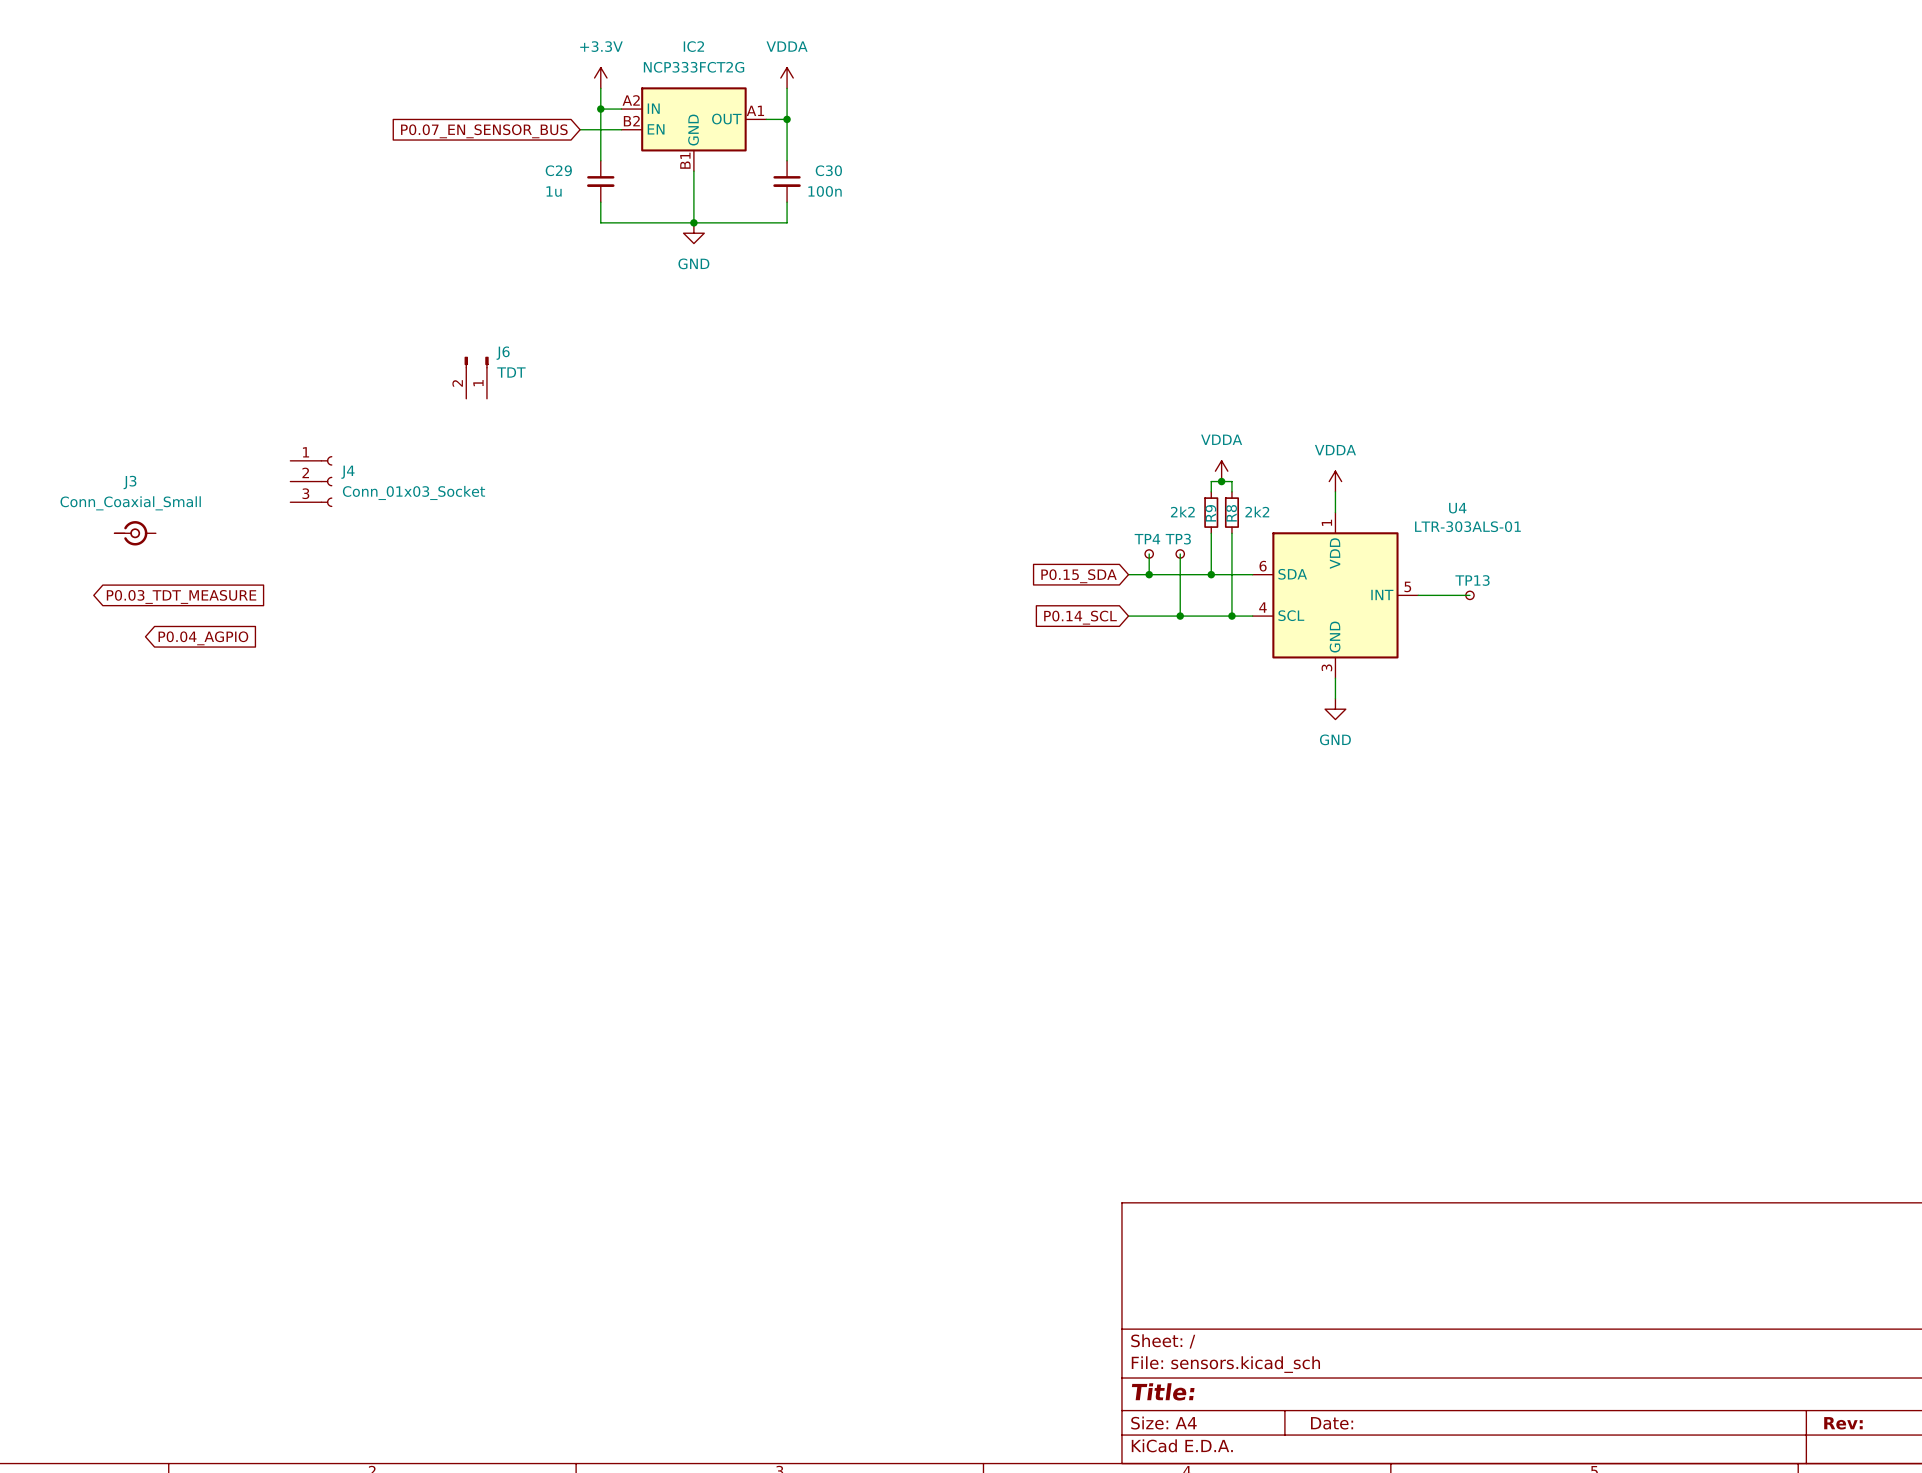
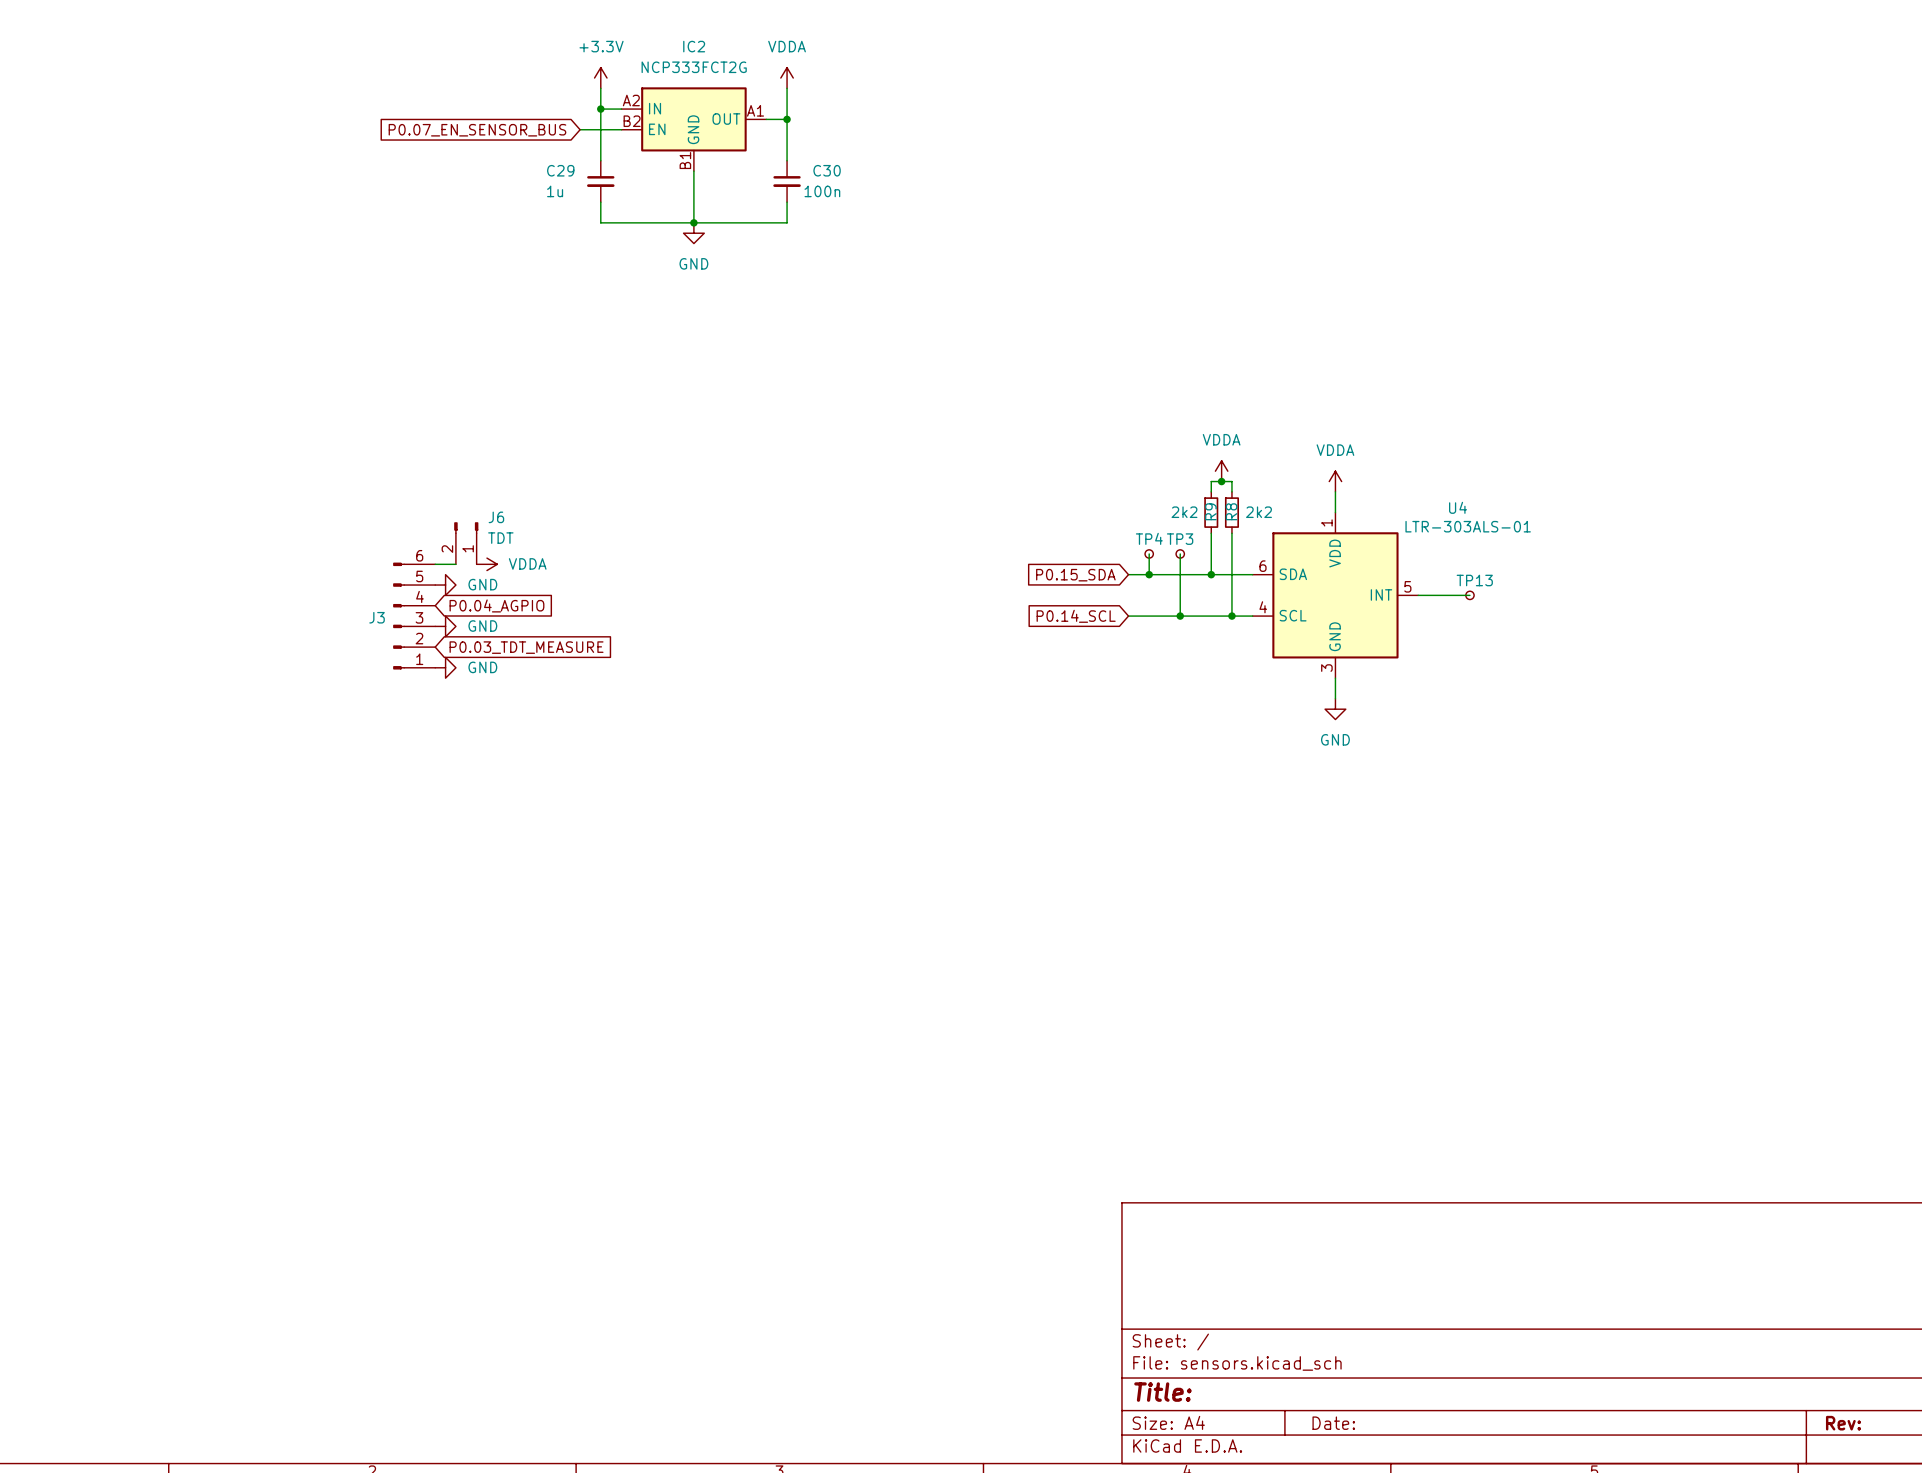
J6 position: (476, 377) -> (466, 543)
J4: Conn_01x03_Socket (311, 481) -> none
J3 name position: J3 (130, 482) -> J3 (377, 617)
J3 value: Conn_Coaxial_Small (130, 503) -> none
J3 symbol: [114, 521, 156, 546] -> [393, 562, 436, 670]
wire: none -> (435, 564) (455, 564)
power symbol: none -> VDDA (486, 564)
power symbol: none -> GND (445, 585)
global label: P0.03_TDT_MEASURE (181, 596) -> none
global label: none -> P0.04_AGPIO (496, 605)
power symbol: none -> GND (445, 626)
global label: P0.04_AGPIO (203, 638) -> none
global label: none -> P0.03_TDT_MEASURE (526, 647)
power symbol: none -> GND (445, 667)

